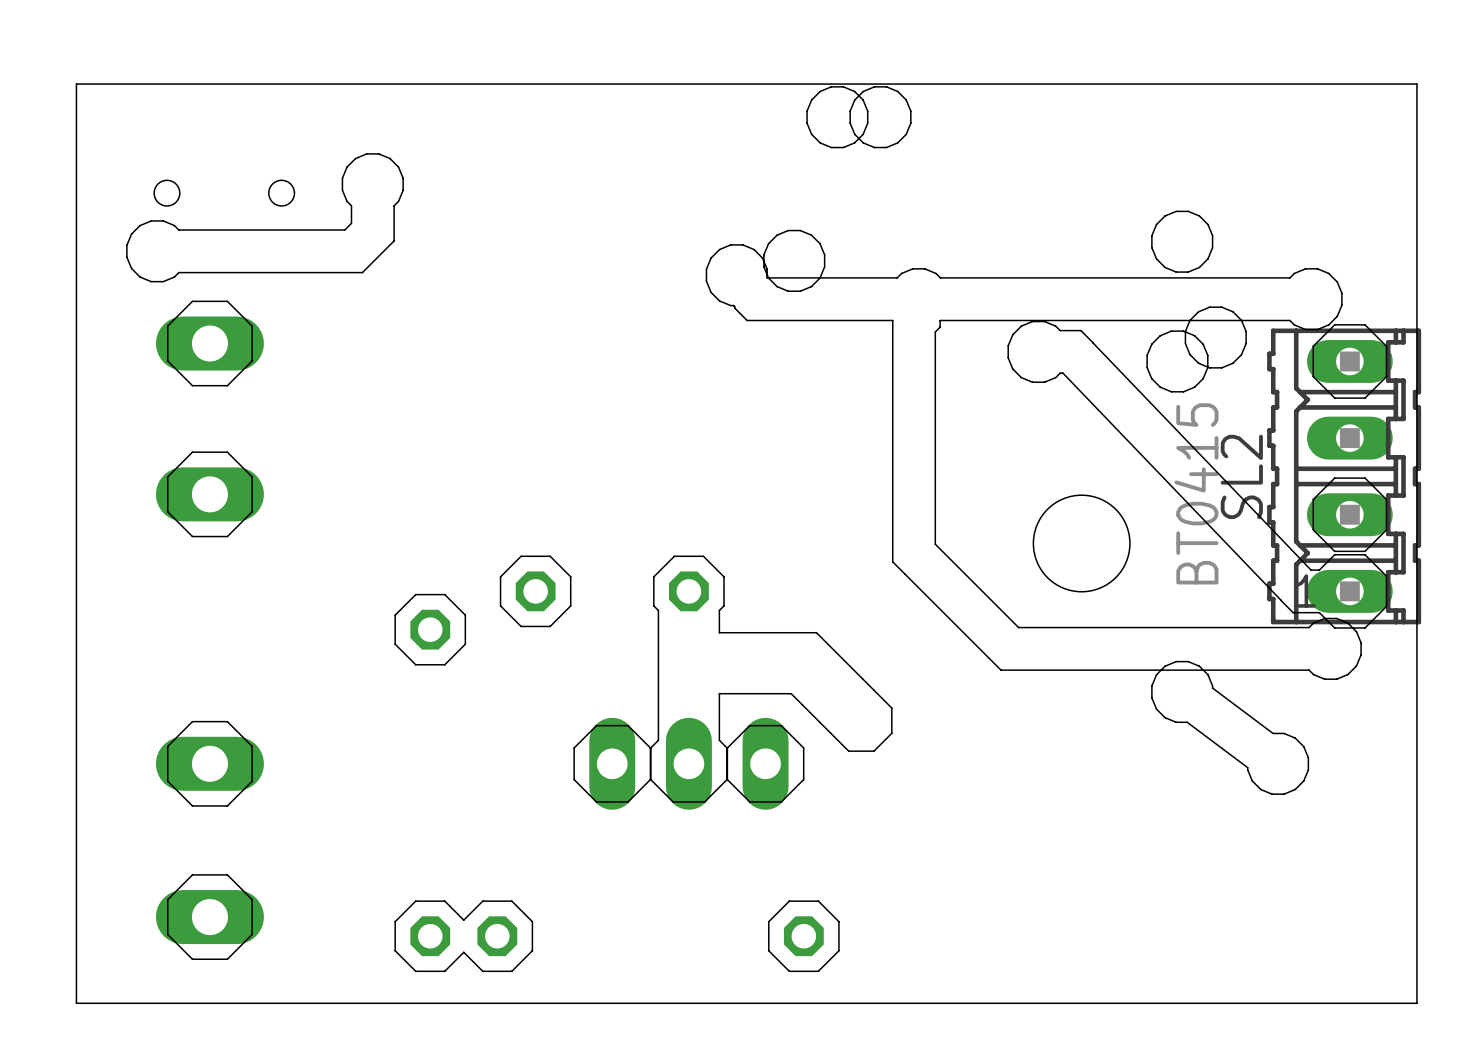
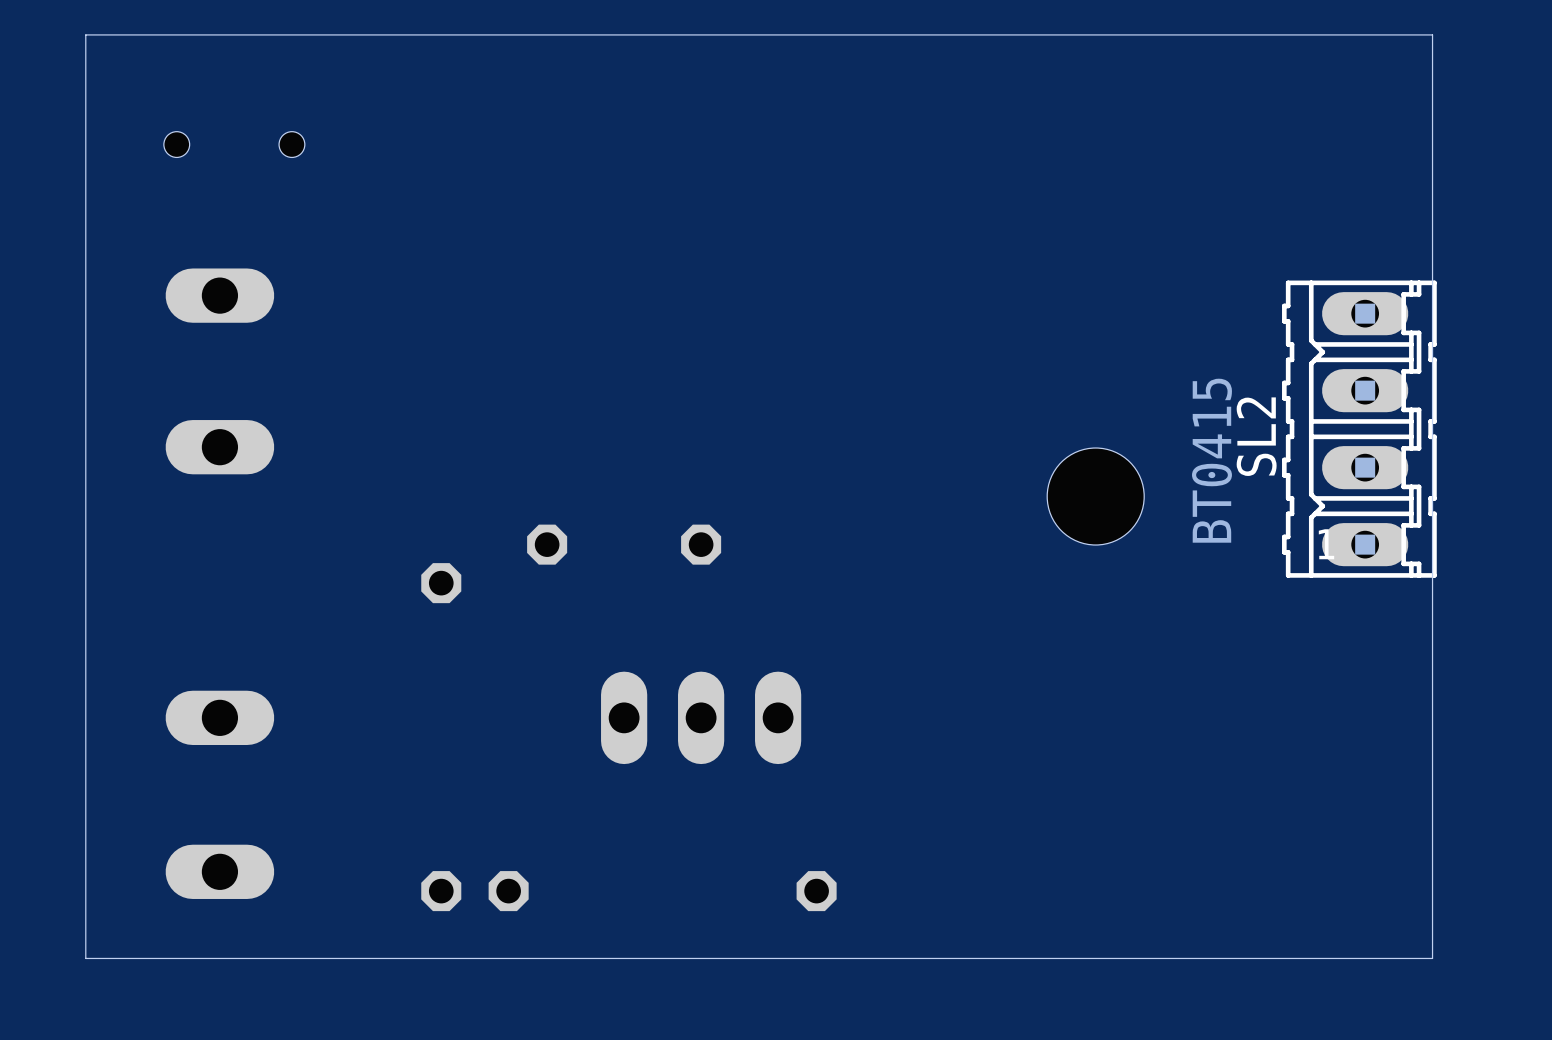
board edge: (843, 86) (831, 86) (820, 91) (811, 100) (807, 111) (807, 123) (811, 134) (820, 142) (831, 147) (843, 147) (854, 142) (863, 134) (867, 123) (867, 111) (863, 100) (854, 91) (843, 86) -> none
board edge: (886, 86) (874, 86) (863, 91) (854, 100) (850, 111) (850, 123) (854, 134) (863, 142) (874, 147) (886, 147) (897, 142) (906, 134) (910, 123) (910, 111) (906, 100) (897, 91) (886, 86) -> none
board edge: (378, 153) (366, 153) (355, 158) (347, 167) (342, 178) (342, 190) (347, 201) (351, 205) (351, 223) (344, 230) (178, 230) (174, 225) (163, 220) (151, 220) (140, 225) (131, 234) (126, 245) (126, 257) (131, 268) (140, 277) (151, 281) (163, 281) (174, 277) (178, 272) (362, 272) (394, 240) (394, 205) (398, 201) (403, 190) (403, 178) (398, 167) (389, 158) (378, 153) -> none
board edge: (1188, 211) (1176, 211) (1165, 216) (1156, 224) (1151, 235) (1151, 247) (1156, 258) (1165, 267) (1176, 272) (1188, 272) (1199, 267) (1207, 258) (1212, 247) (1212, 235) (1207, 224) (1199, 216) (1188, 211) -> none
board edge: (800, 230) (788, 230) (777, 235) (768, 243) (763, 254) (763, 266) (768, 278) (777, 286) (788, 291) (800, 291) (811, 286) (820, 278) (824, 266) (824, 254) (820, 243) (811, 235) (800, 230) -> none
board edge: (227, 301) (192, 301) (167, 326) (167, 360) (192, 385) (227, 385) (252, 360) (252, 326) (227, 301) -> none
board edge: (1221, 307) (1209, 307) (1198, 311) (1190, 320) (1185, 331) (1185, 343) (1190, 354) (1198, 363) (1209, 367) (1221, 367) (1232, 363) (1241, 354) (1246, 343) (1246, 331) (1241, 320) (1232, 311) (1221, 307) -> none
board edge: (940, 320) (1289, 320) (1294, 324) (1305, 329) (1317, 329) (1328, 324) (1337, 316) (1341, 305) (1341, 293) (1337, 282) (1328, 273) (1317, 268) (1305, 268) (1294, 273) (1289, 277) (940, 277) (935, 273) (924, 268) (912, 268) (901, 273) (897, 277) (767, 277) (767, 269) (762, 258) (753, 249) (742, 244) (730, 244) (719, 249) (711, 258) (706, 269) (706, 281) (711, 292) (719, 300) (733, 305) (747, 320) (892, 320) (892, 561) (1000, 670) (1309, 670) (1313, 674) (1324, 679) (1336, 679) (1347, 674) (1356, 666) (1361, 654) (1361, 642) (1356, 631) (1347, 623) (1336, 618) (1324, 618) (1313, 623) (1309, 627) (1018, 627) (935, 544) (935, 331) (940, 327) (940, 320) -> none
board edge: (1365, 324) (1334, 324) (1313, 346) (1313, 376) (1334, 398) (1365, 398) (1386, 376) (1386, 346) (1365, 324) -> none
board edge: (1183, 331) (1171, 331) (1160, 335) (1151, 344) (1147, 355) (1147, 367) (1151, 378) (1160, 387) (1171, 391) (1183, 391) (1194, 387) (1203, 378) (1207, 367) (1207, 355) (1203, 344) (1194, 335) (1183, 331) -> none
board edge: (1093, 343) (1080, 330) (1060, 330) (1055, 326) (1044, 321) (1032, 321) (1021, 326) (1012, 334) (1008, 345) (1008, 357) (1012, 369) (1021, 377) (1032, 382) (1044, 382) (1063, 373) (1280, 599) -> none
board edge: (1093, 343) (1311, 570) (1319, 570) (1334, 554) (1365, 554) (1386, 576) (1386, 606) (1365, 627) (1334, 627) (1319, 612) (1293, 612) (1280, 600) -> none
board edge: (227, 452) (192, 452) (167, 476) (167, 511) (192, 536) (227, 536) (252, 511) (252, 476) (227, 452) -> none
board edge: (1365, 478) (1334, 478) (1313, 499) (1313, 529) (1334, 551) (1365, 551) (1386, 529) (1386, 499) (1365, 478) -> none
board edge: (550, 556) (521, 556) (500, 576) (500, 605) (521, 626) (550, 626) (570, 605) (570, 576) (550, 556) -> none
board edge: (703, 556) (674, 556) (653, 576) (653, 605) (658, 610) (658, 740) (650, 748) (650, 779) (673, 801) (704, 801) (727, 779) (727, 748) (719, 740) (719, 693) (791, 693) (848, 751) (873, 751) (891, 733) (891, 708) (816, 632) (719, 632) (719, 610) (723, 605) (723, 576) (703, 556) -> none
board edge: (444, 594) (415, 594) (395, 615) (395, 644) (415, 664) (444, 664) (465, 644) (465, 615) (444, 594) -> none
board edge: (1188, 661) (1176, 661) (1165, 666) (1156, 674) (1151, 685) (1151, 697) (1156, 709) (1165, 717) (1176, 722) (1187, 722) (1247, 767) (1252, 780) (1260, 789) (1272, 794) (1284, 794) (1295, 789) (1303, 780) (1308, 769) (1308, 757) (1303, 746) (1295, 738) (1284, 733) (1273, 733) (1212, 688) (1207, 674) (1199, 666) (1188, 661) -> none
board edge: (227, 721) (192, 721) (167, 746) (167, 781) (192, 805) (227, 805) (252, 781) (252, 746) (227, 721) -> none
board edge: (628, 725) (596, 725) (574, 748) (574, 779) (596, 801) (628, 801) (650, 779) (650, 748) (628, 725) -> none
board edge: (781, 725) (749, 725) (727, 748) (727, 779) (749, 801) (781, 801) (803, 779) (803, 748) (781, 725) -> none
board edge: (227, 874) (192, 874) (167, 899) (167, 934) (192, 959) (227, 959) (252, 934) (252, 899) (227, 874) -> none
board edge: (511, 901) (482, 901) (463, 920) (444, 901) (415, 901) (395, 921) (395, 950) (415, 971) (444, 971) (463, 952) (482, 971) (511, 971) (532, 950) (532, 921) (511, 901) -> none
board edge: (818, 901) (789, 901) (768, 921) (768, 950) (789, 971) (818, 971) (838, 950) (838, 921) (818, 901) -> none

